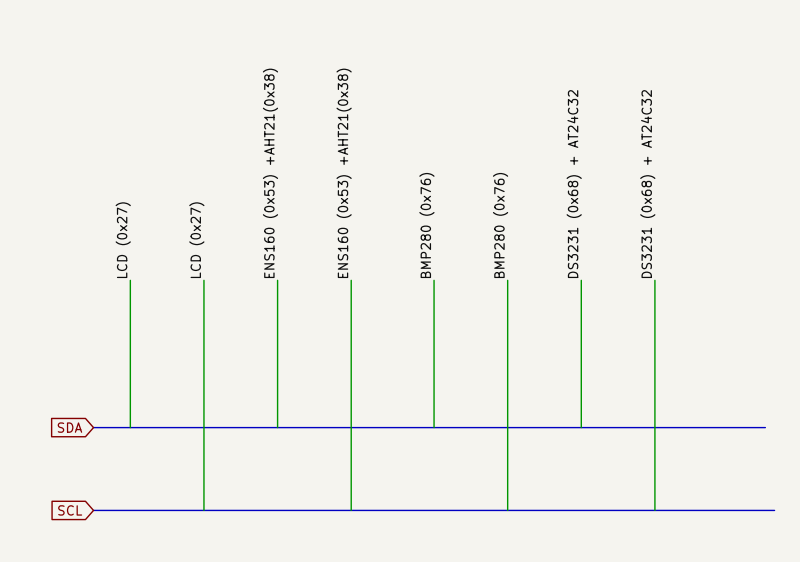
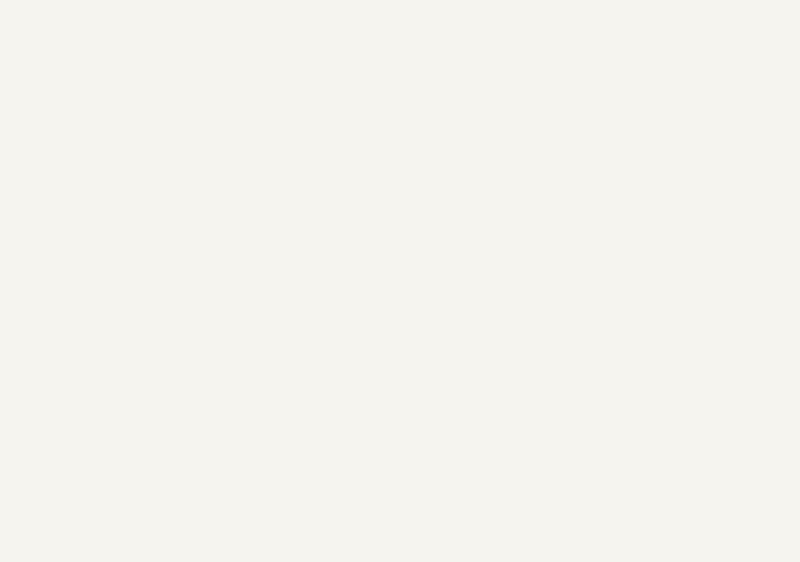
label: ENS160 (0x53) +AHT21(0x38) (270, 173) -> none
label: ENS160 (0x53) +AHT21(0x38) (344, 173) -> none
label: DS3231 (0x68) + AT24C32 (574, 184) -> none
label: DS3231 (0x68) + AT24C32 (647, 184) -> none
label: BMP280 (0x76) (426, 225) -> none
label: BMP280 (0x76) (500, 225) -> none
label: LCD (0x27) (123, 240) -> none
label: LCD (0x27) (196, 240) -> none
wire: (130, 280) (130, 427) -> none
wire: (203, 280) (203, 510) -> none
wire: (277, 280) (277, 427) -> none
wire: (351, 280) (351, 510) -> none
wire: (434, 280) (434, 427) -> none
wire: (507, 280) (507, 510) -> none
wire: (581, 280) (581, 427) -> none
wire: (654, 280) (654, 510) -> none
global label: SDA (69, 427) -> none
bus: (93, 427) (765, 427) -> none
global label: SCL (70, 510) -> none
bus: (93, 510) (774, 510) -> none

